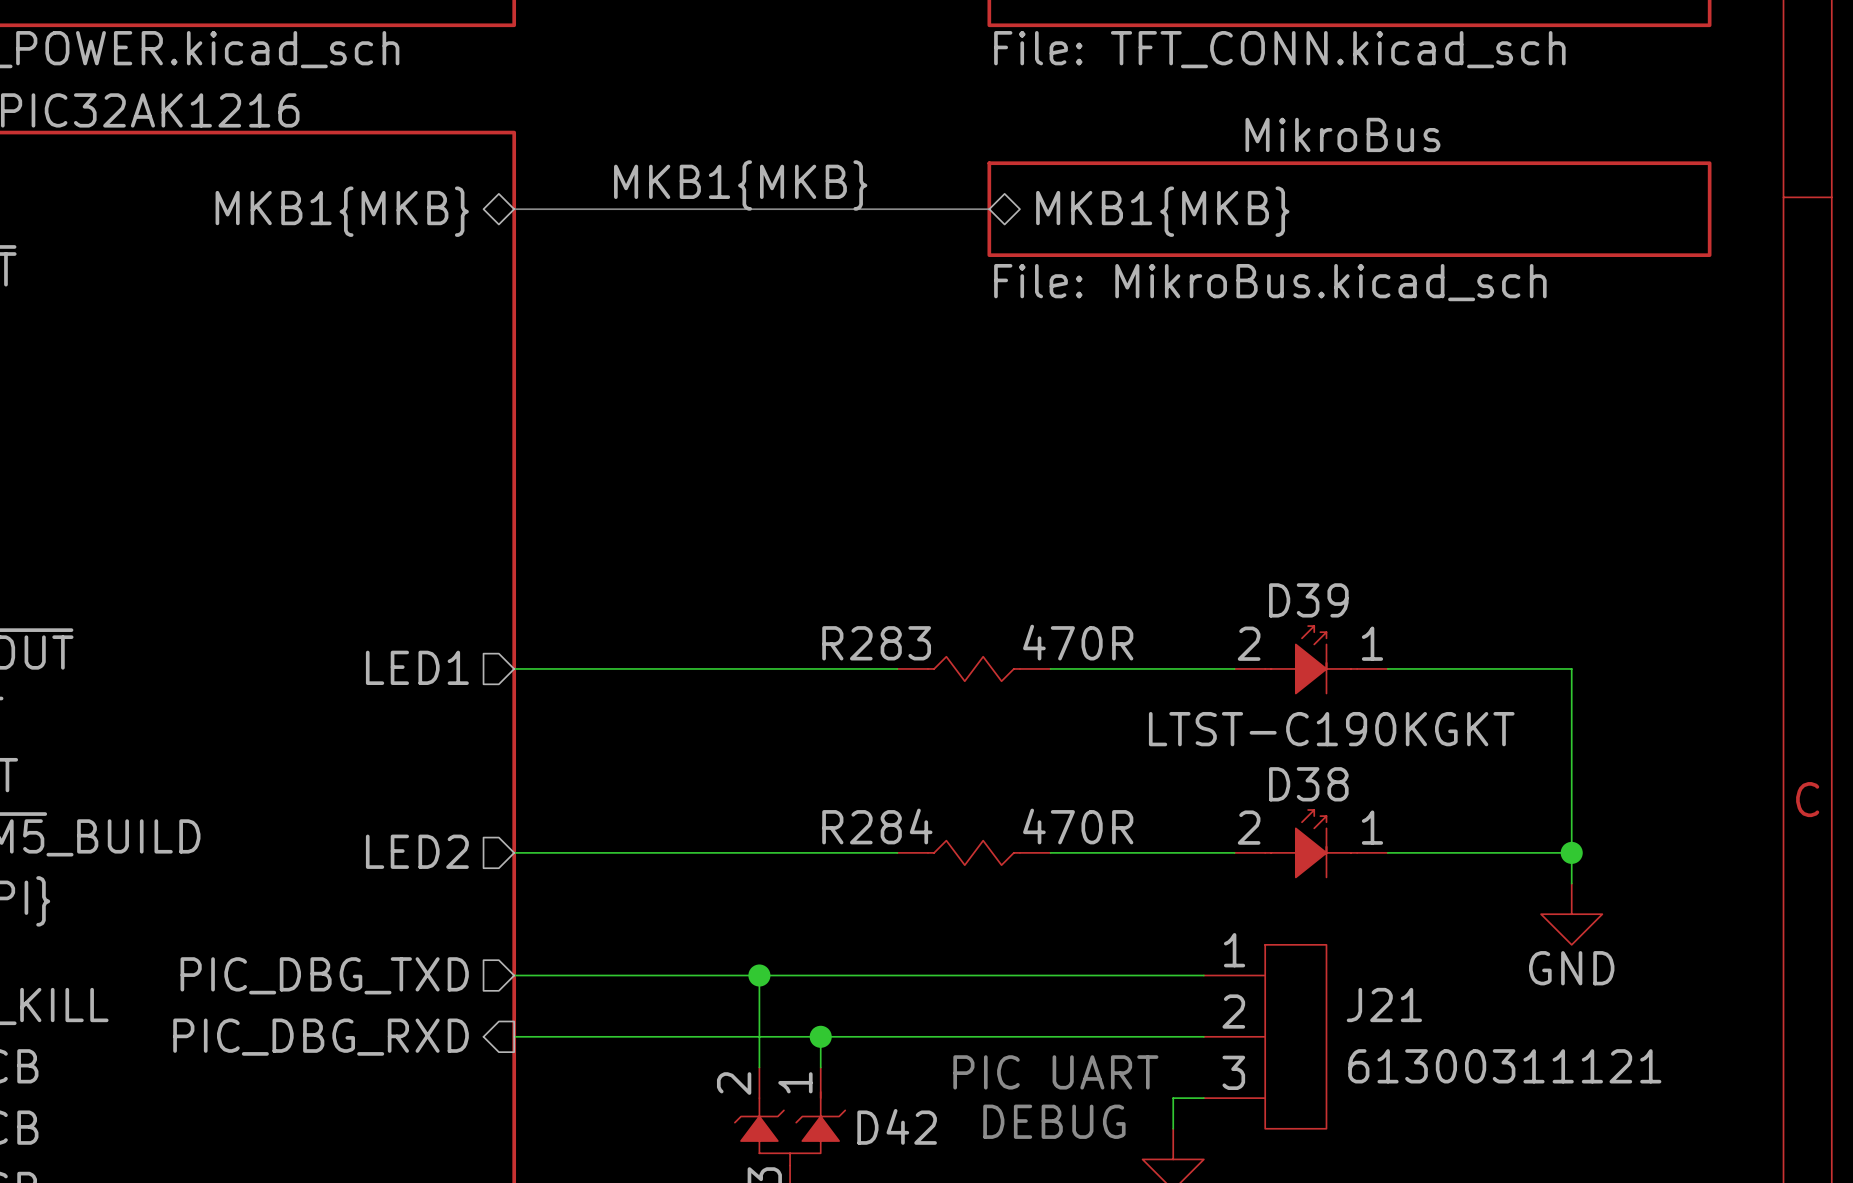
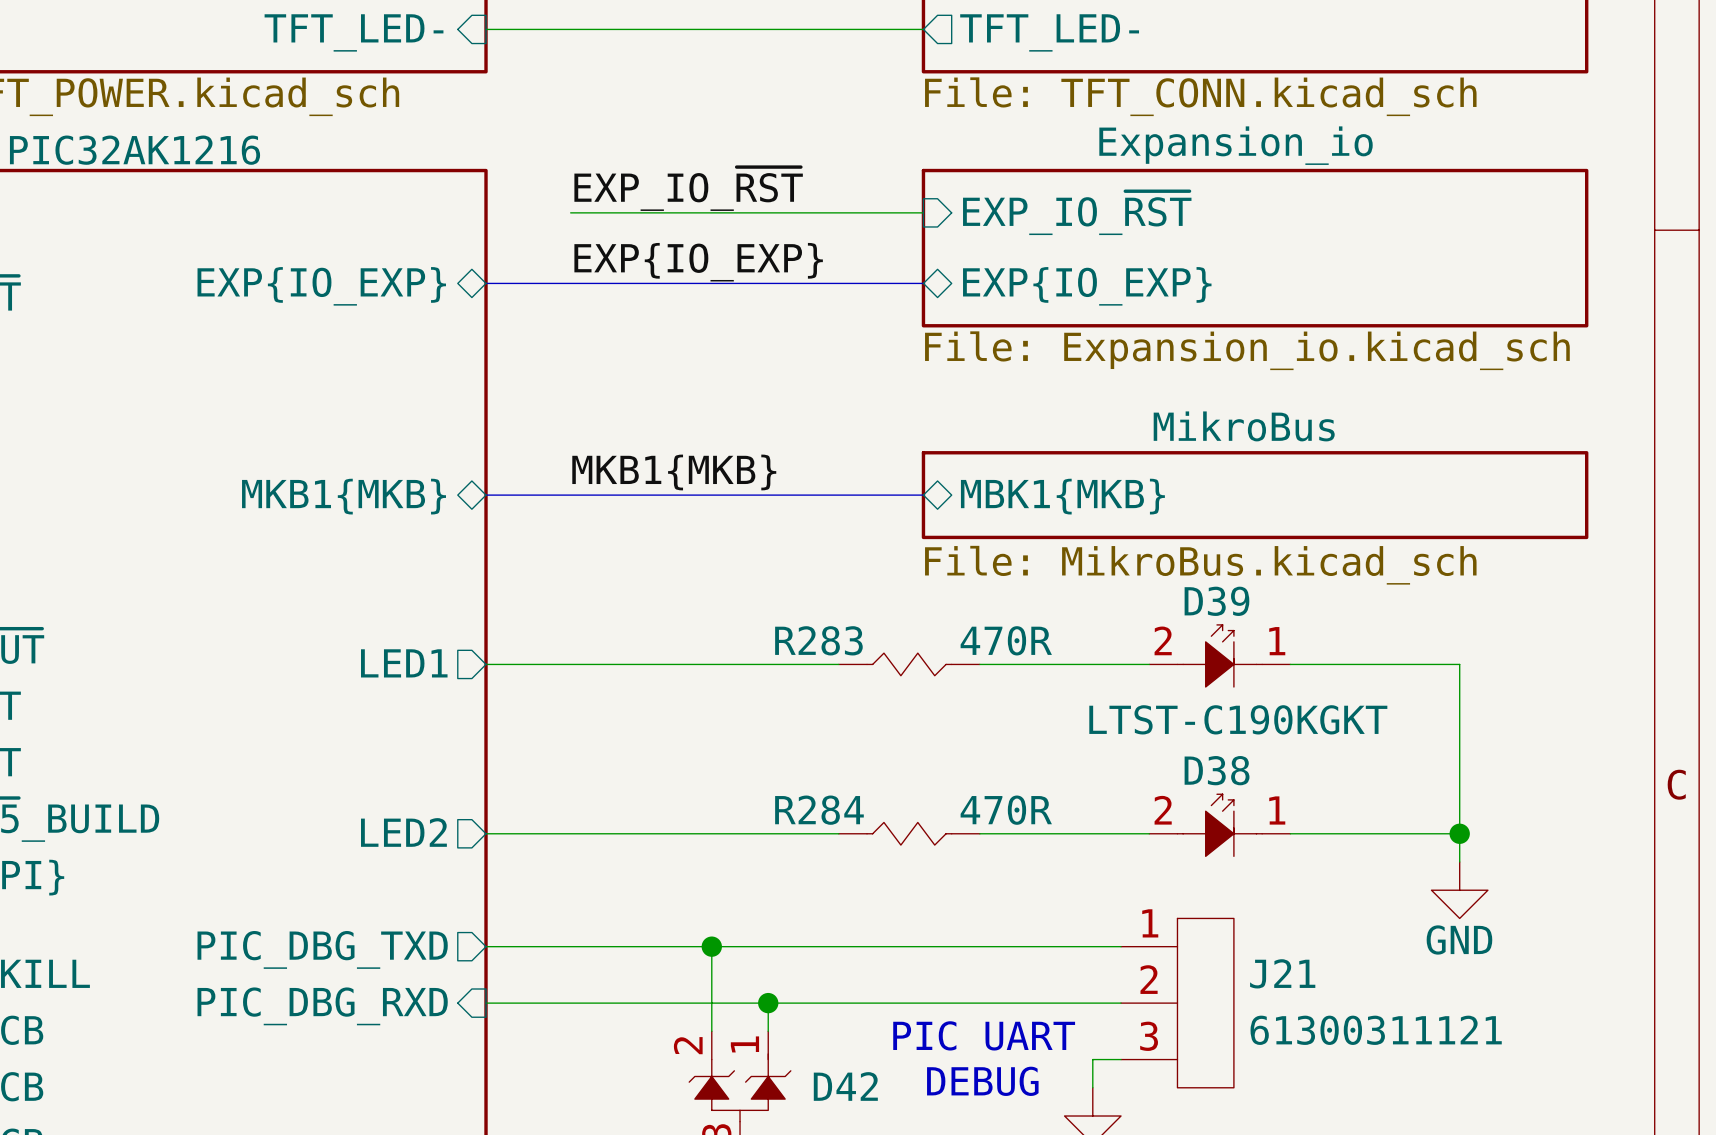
label: none -> EXP_IO_~{RST} (688, 189)
sheet pin: none -> EXP_IO_~{RST} (1077, 213)
wire: none -> (570, 212) (923, 212)
label position: MKB1{MKB} (740, 185) -> MKB1{MKB} (674, 472)
bus: (514, 209) (989, 209) -> (486, 283) (923, 283)
sheet MikroBus position: (1349, 209) -> (1255, 495)
sheet pin position: MKB1{MKB} (342, 211) -> MKB1{MKB} (344, 496)
sheet pin: MKB1{MKB} (1162, 211) -> none
sheet Expansion_io: none -> File: Expansion_io.kicad_sch (1255, 248)
label: none -> EXP{IO_EXP} (698, 262)
sheet pin: none -> EXP{IO_EXP} (321, 286)
sheet pin: none -> EXP{IO_EXP} (1087, 286)
bus: none -> (486, 495) (923, 495)
sheet pin: none -> MBK1{MKB} (1062, 496)

